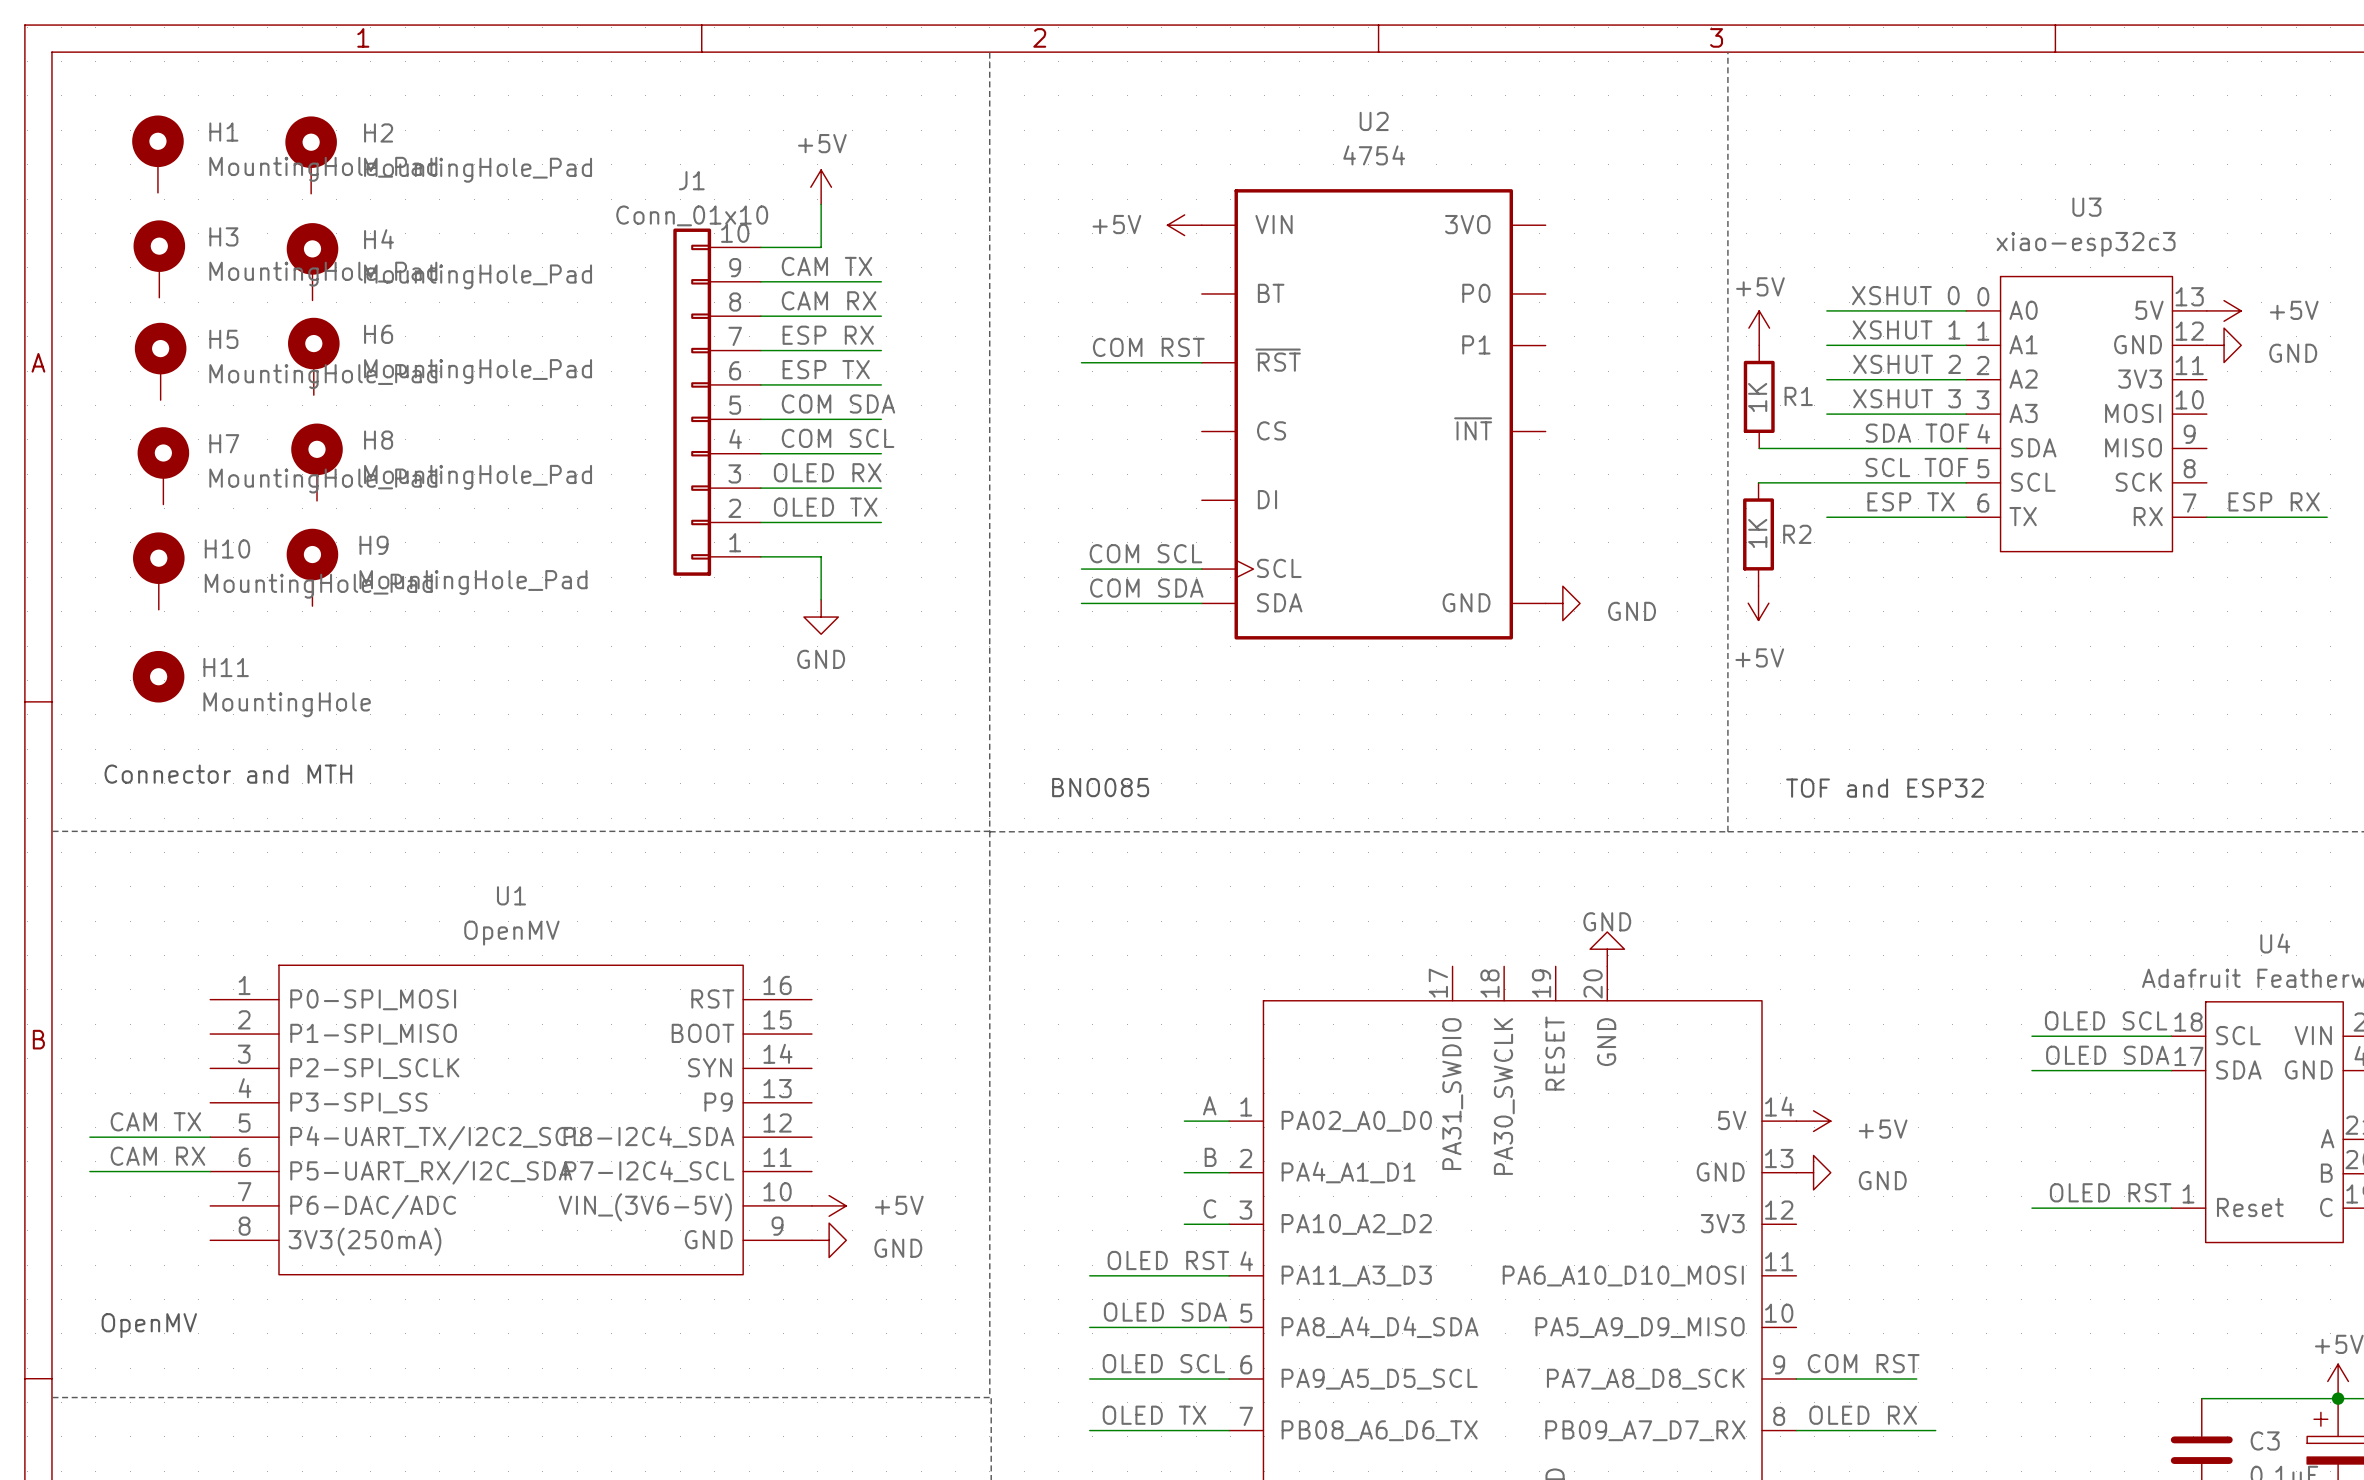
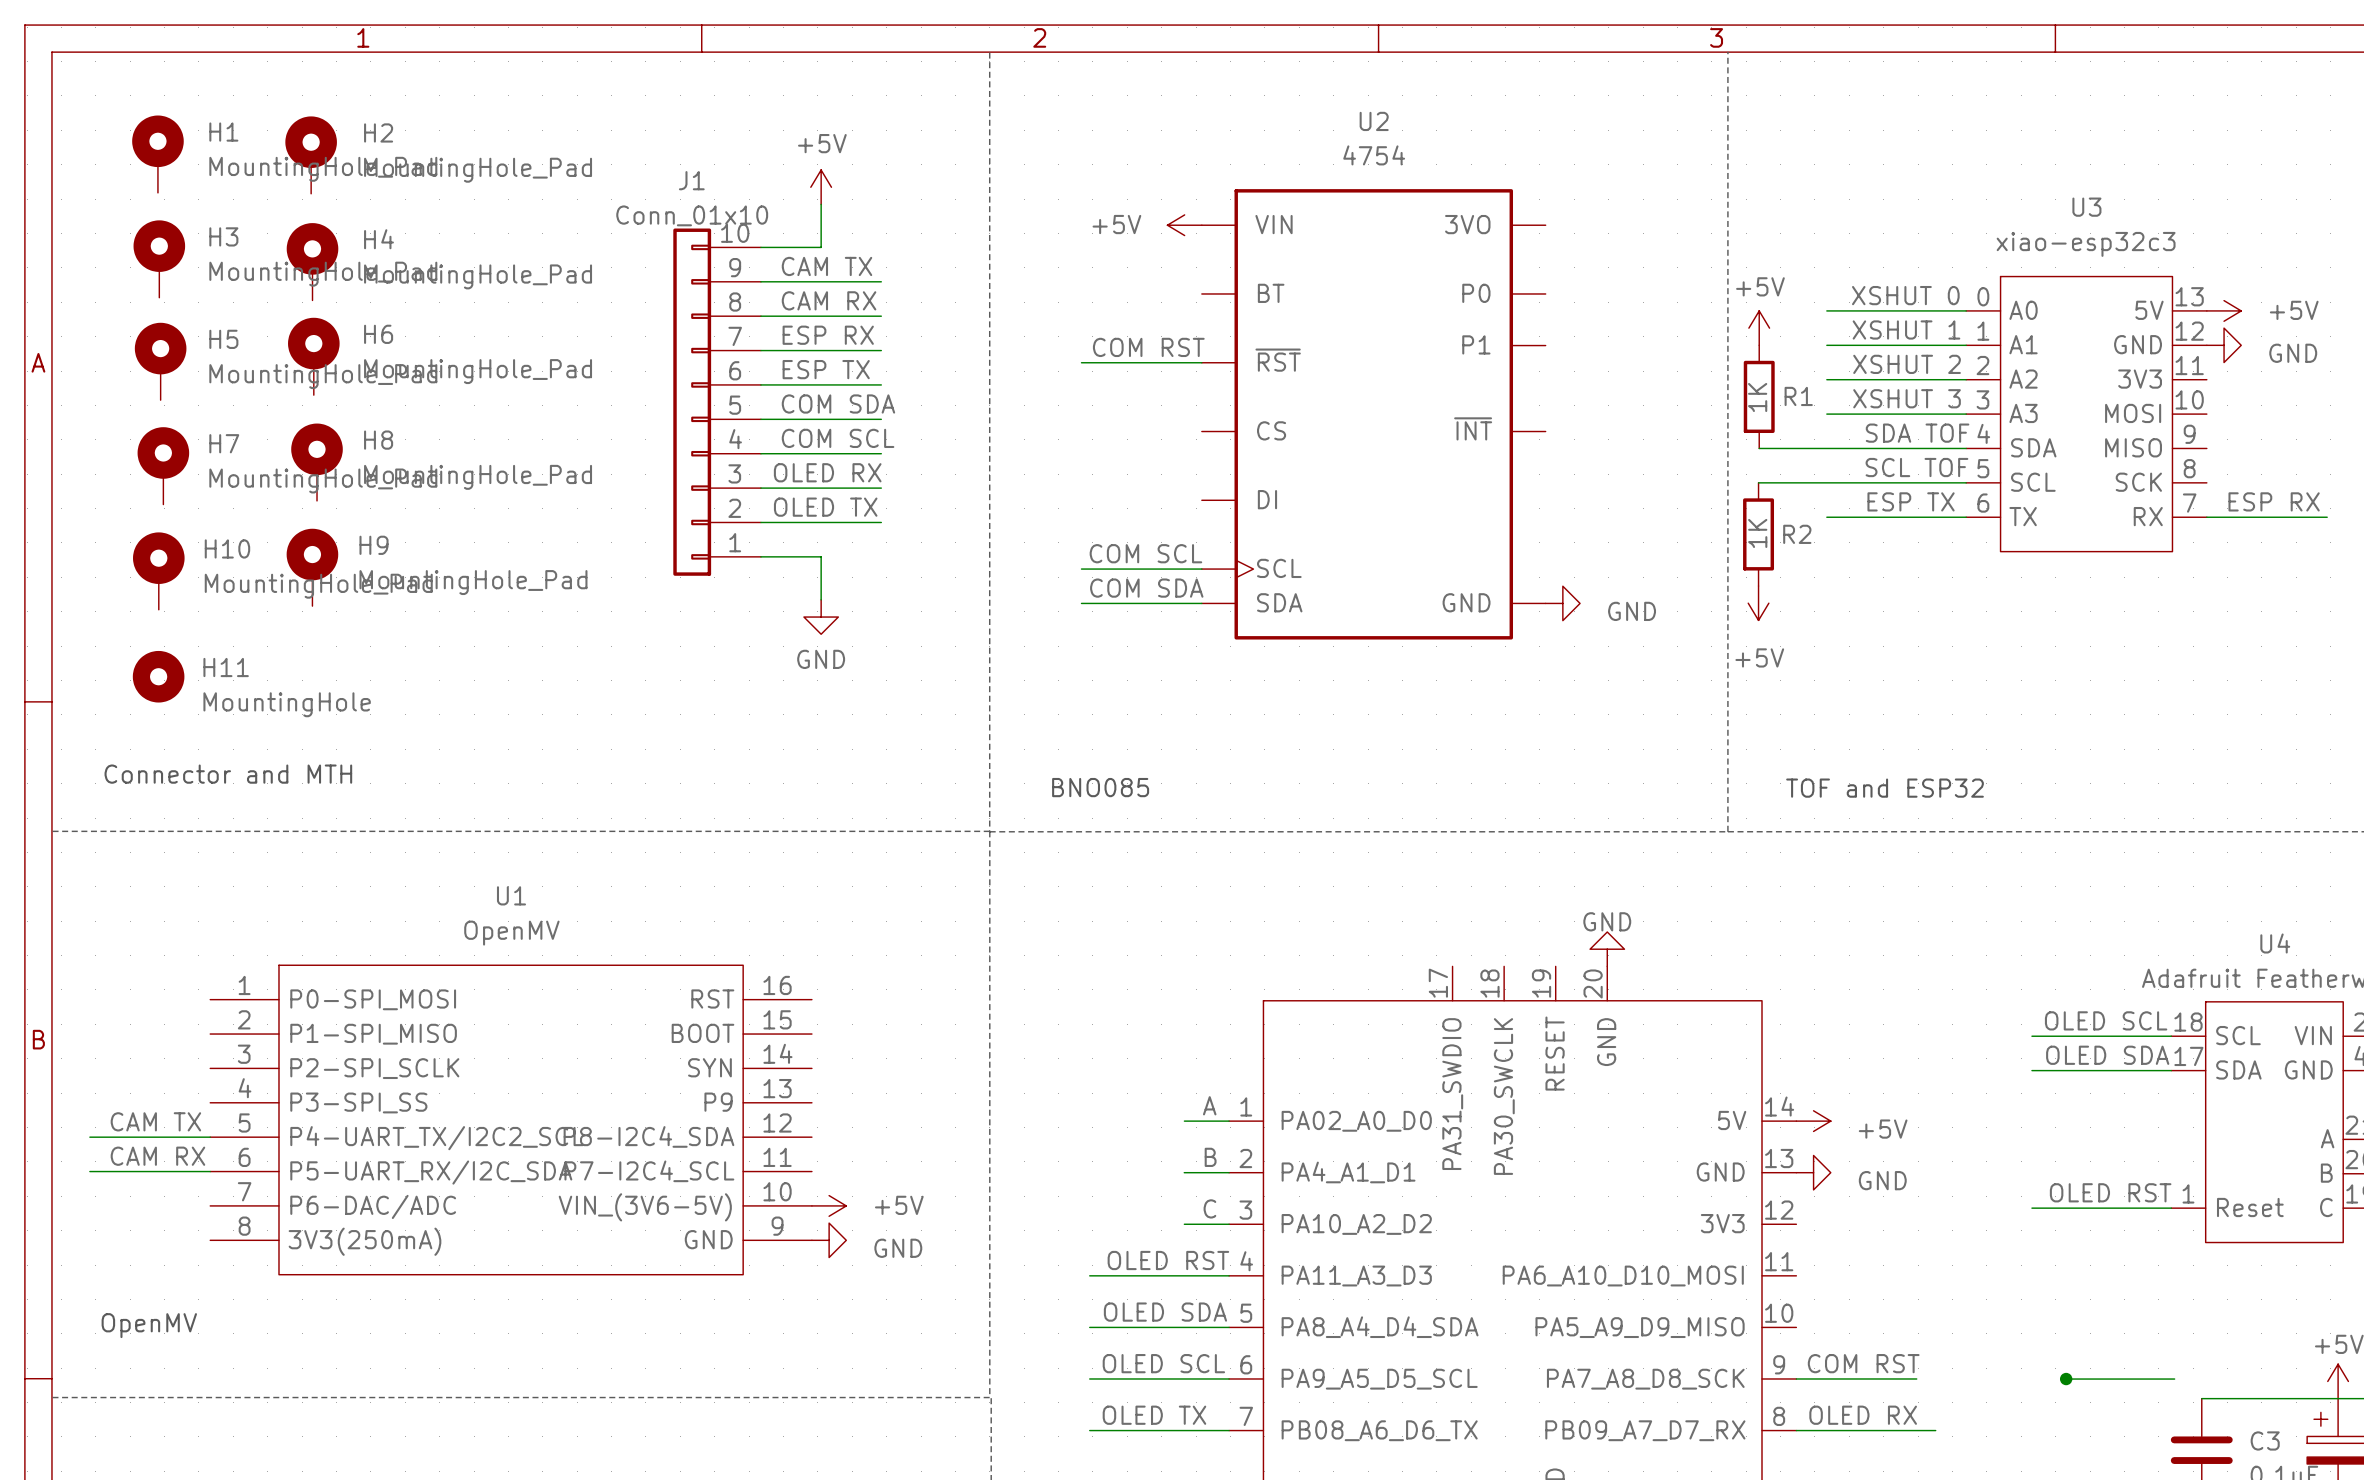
wire: none -> (2066, 1379) (2174, 1379)
junction: none -> (2066, 1379)
junction: (2338, 1398) -> none

